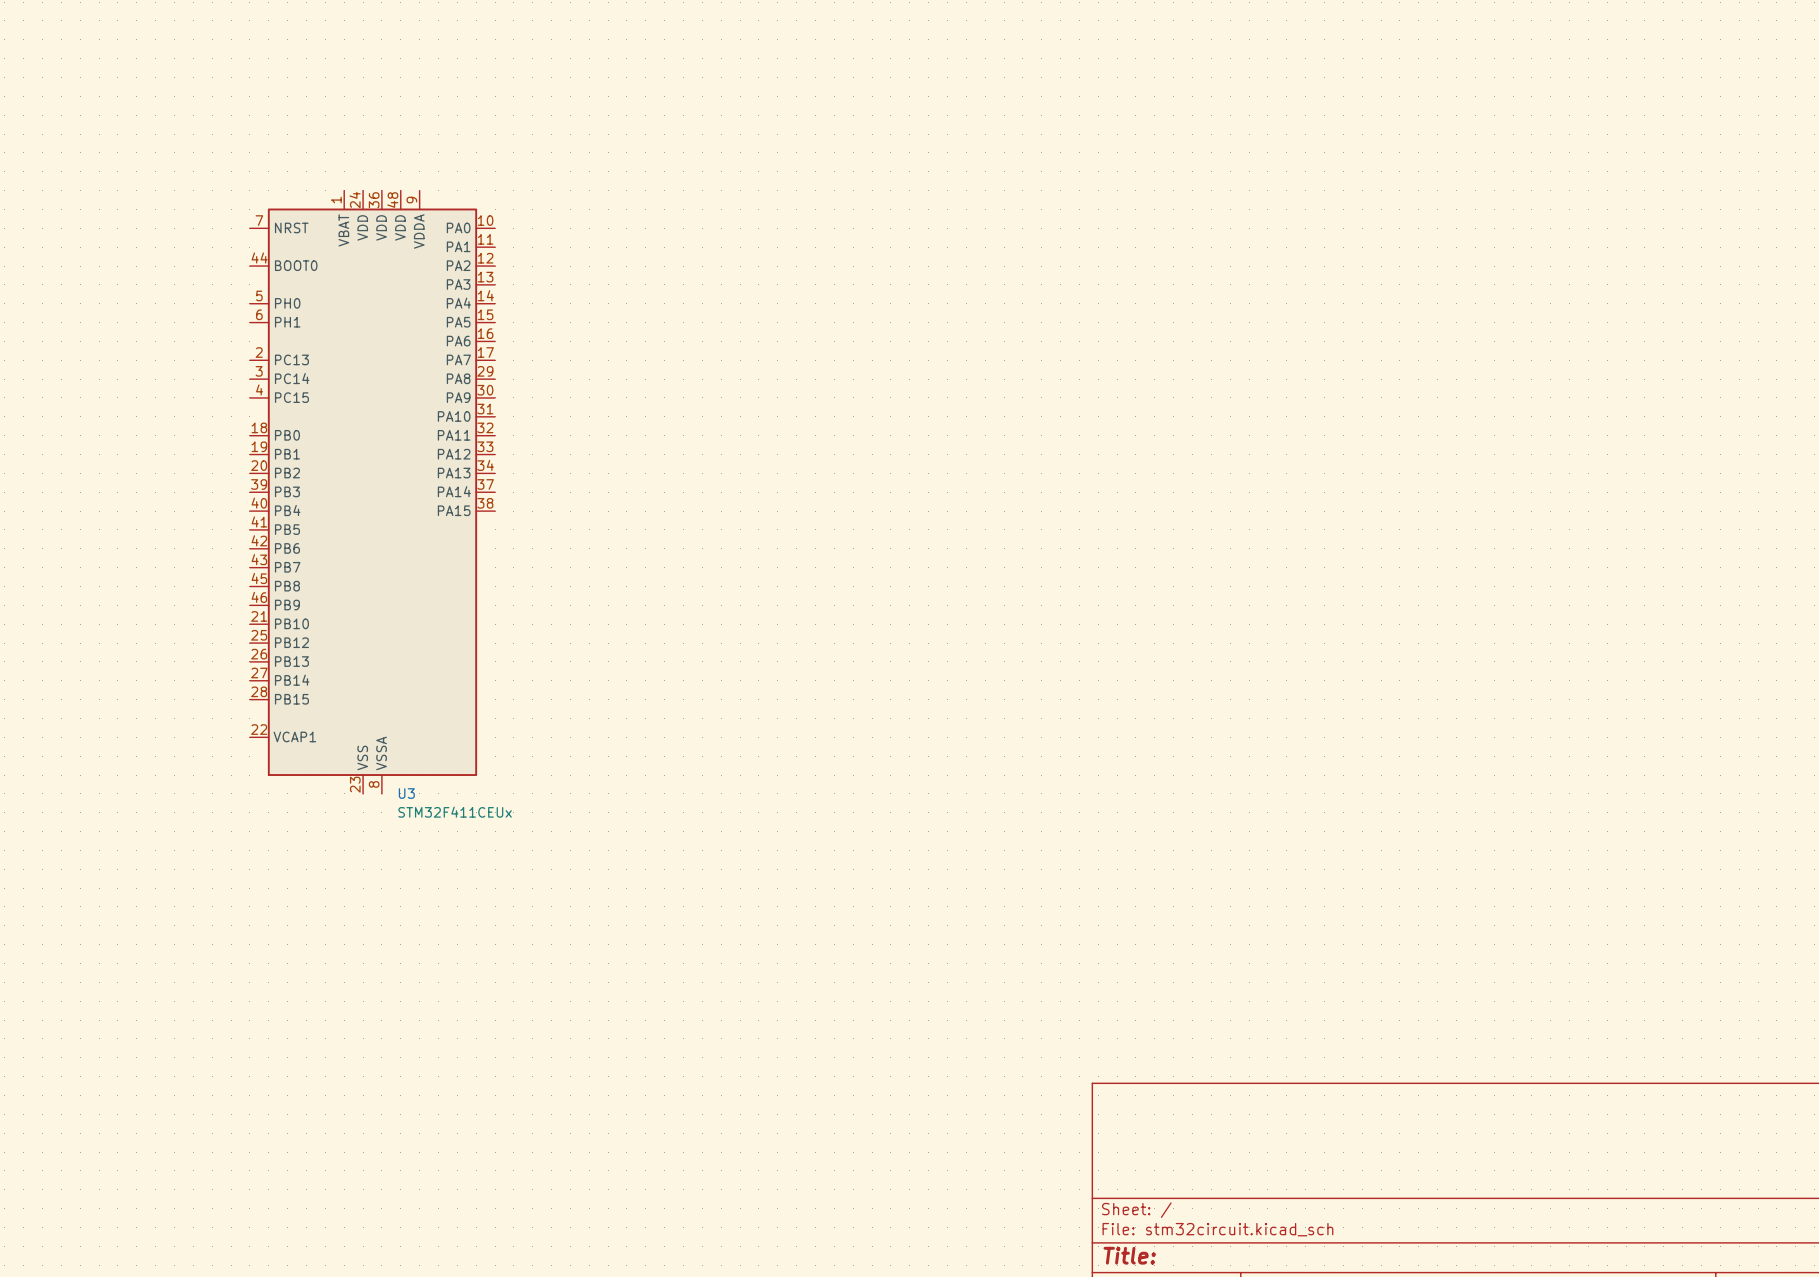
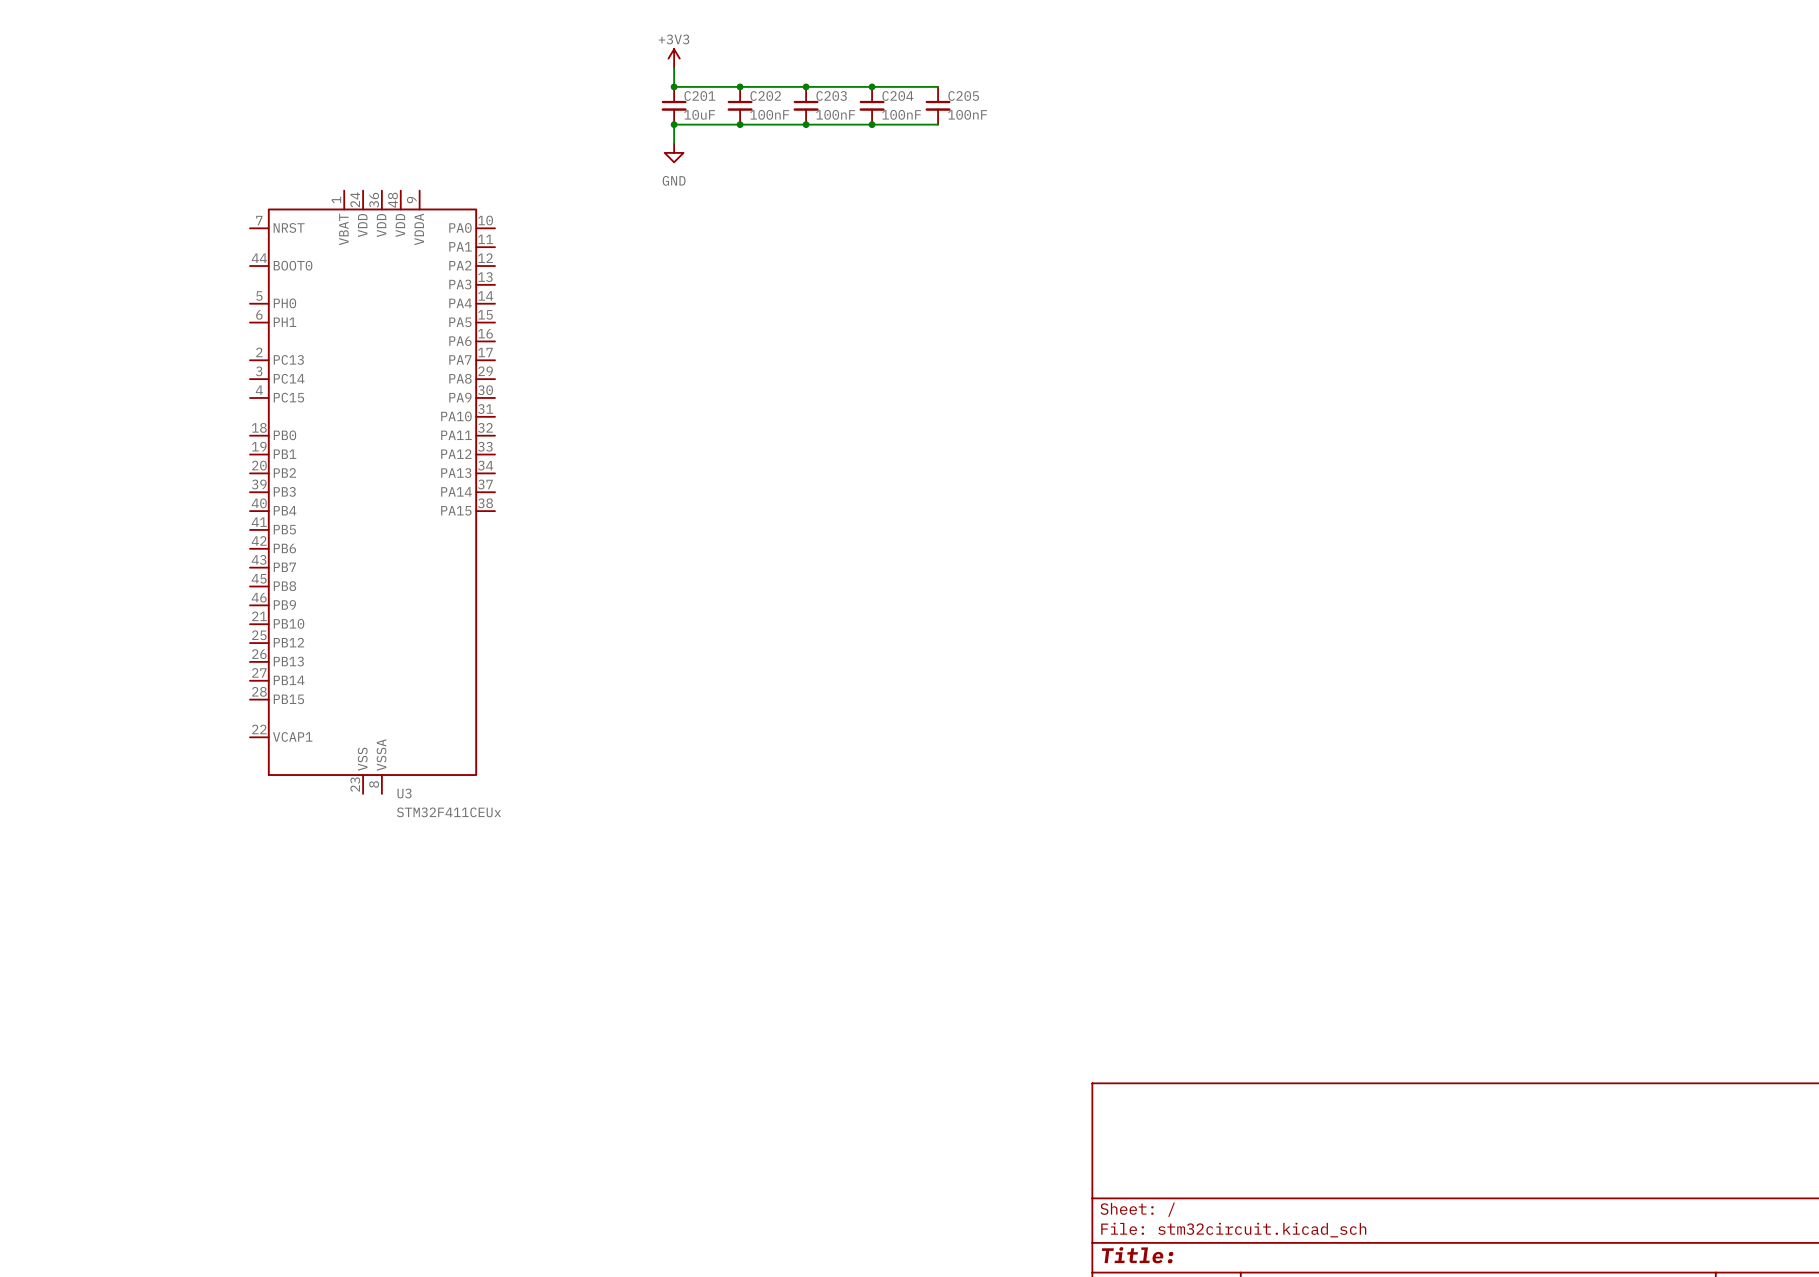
power symbol: none -> +3V3 (674, 58)
wire: none -> (674, 68) (674, 86) (938, 86)
junction: none -> (674, 86)
junction: none -> (740, 86)
junction: none -> (806, 86)
junction: none -> (872, 86)
C201: none -> 10uF (674, 105)
C202: none -> 100nF (740, 105)
C203: none -> 100nF (806, 105)
C204: none -> 100nF (872, 105)
C205: none -> 100nF (938, 105)
junction: none -> (674, 124)
junction: none -> (740, 124)
junction: none -> (806, 124)
junction: none -> (872, 124)
wire: none -> (938, 124) (674, 124) (674, 143)
power symbol: none -> GND (674, 152)

